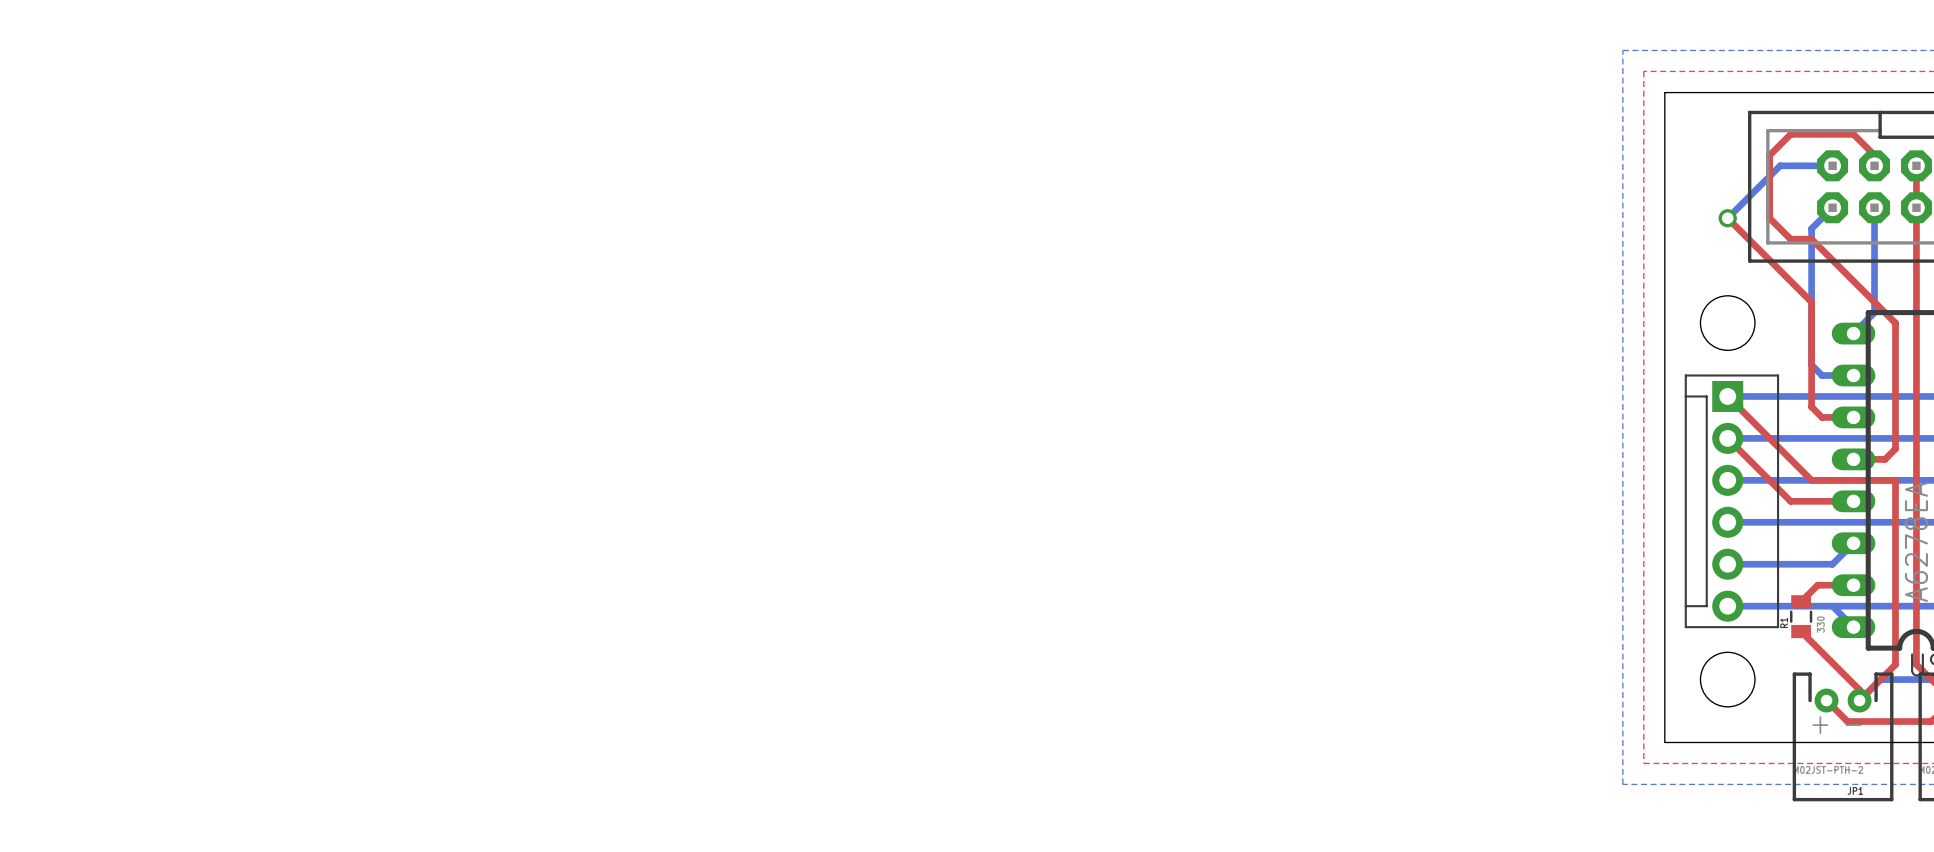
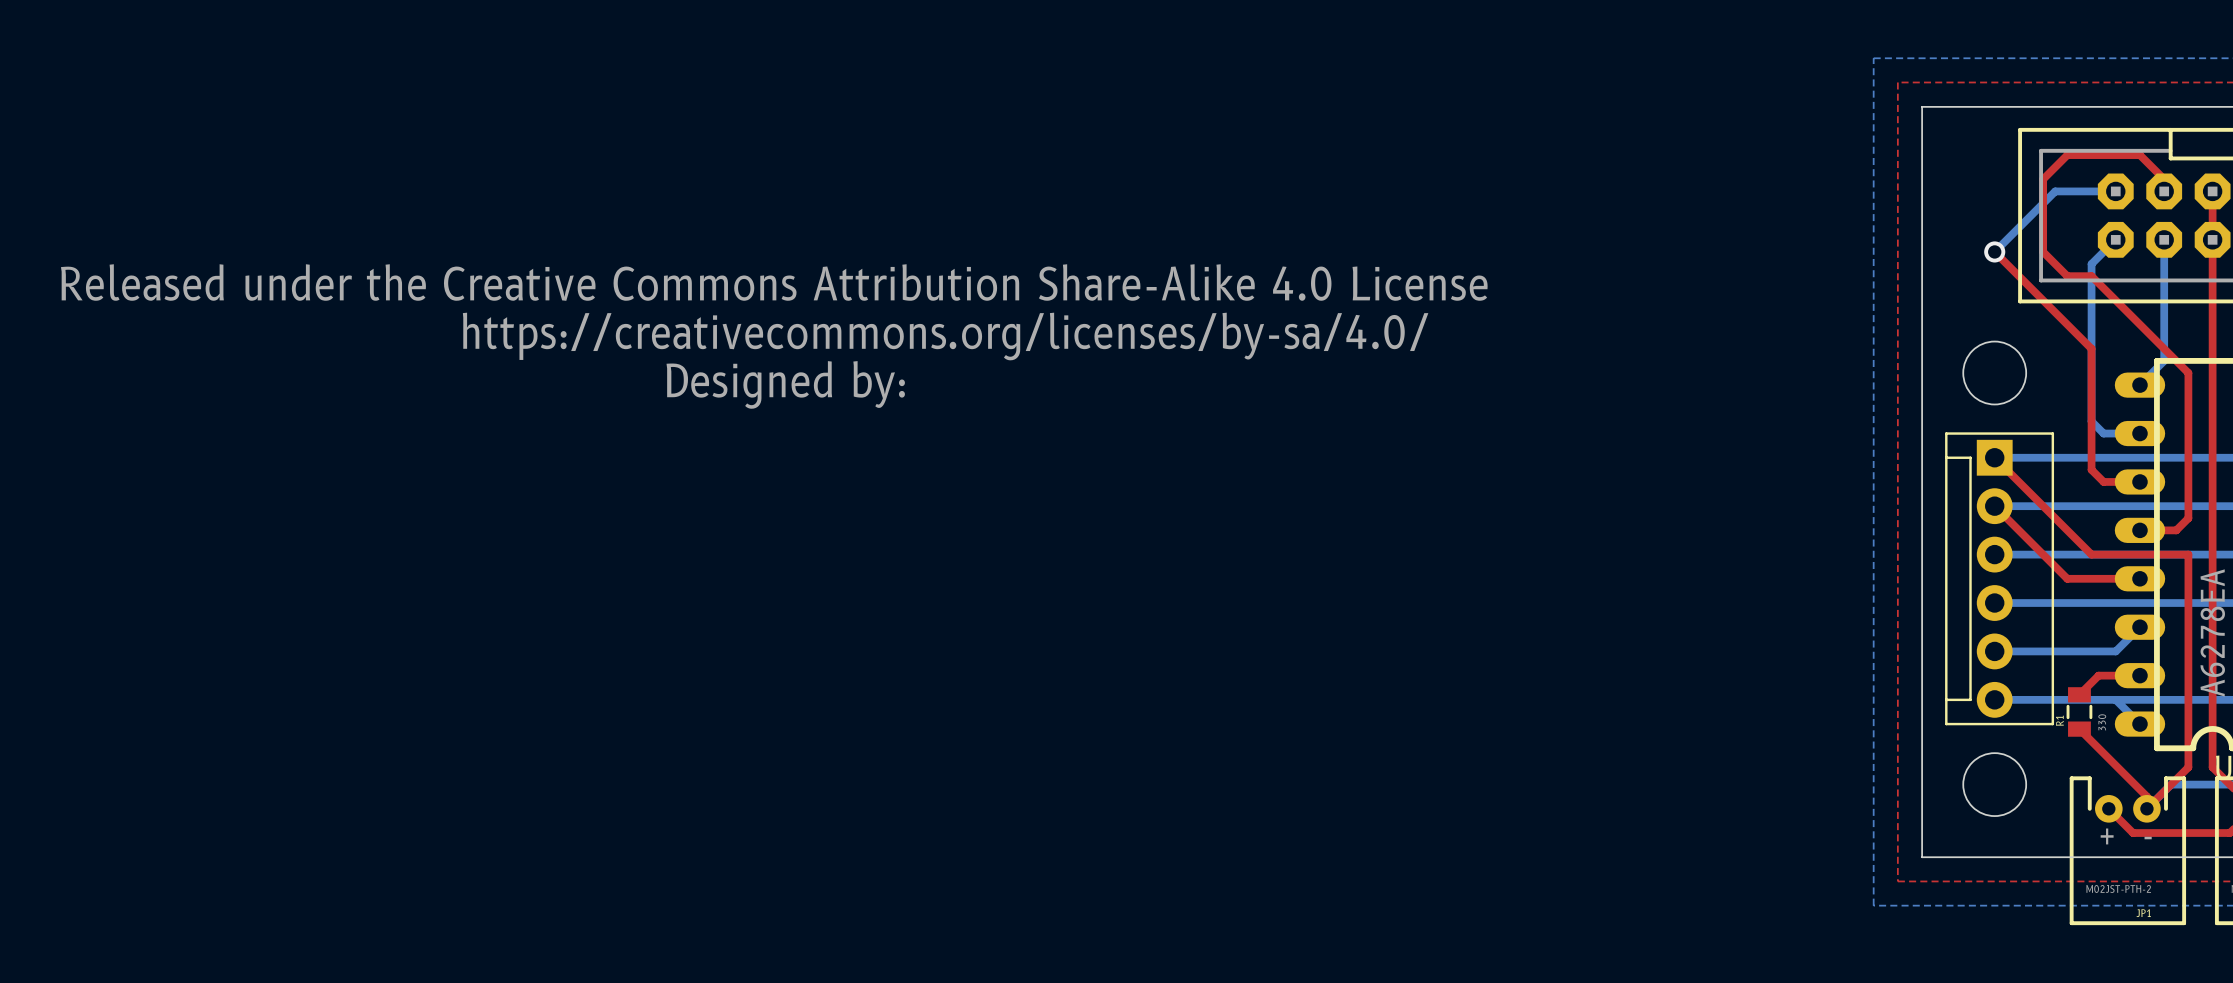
drawing: none -> [60, 264, 1488, 409]

